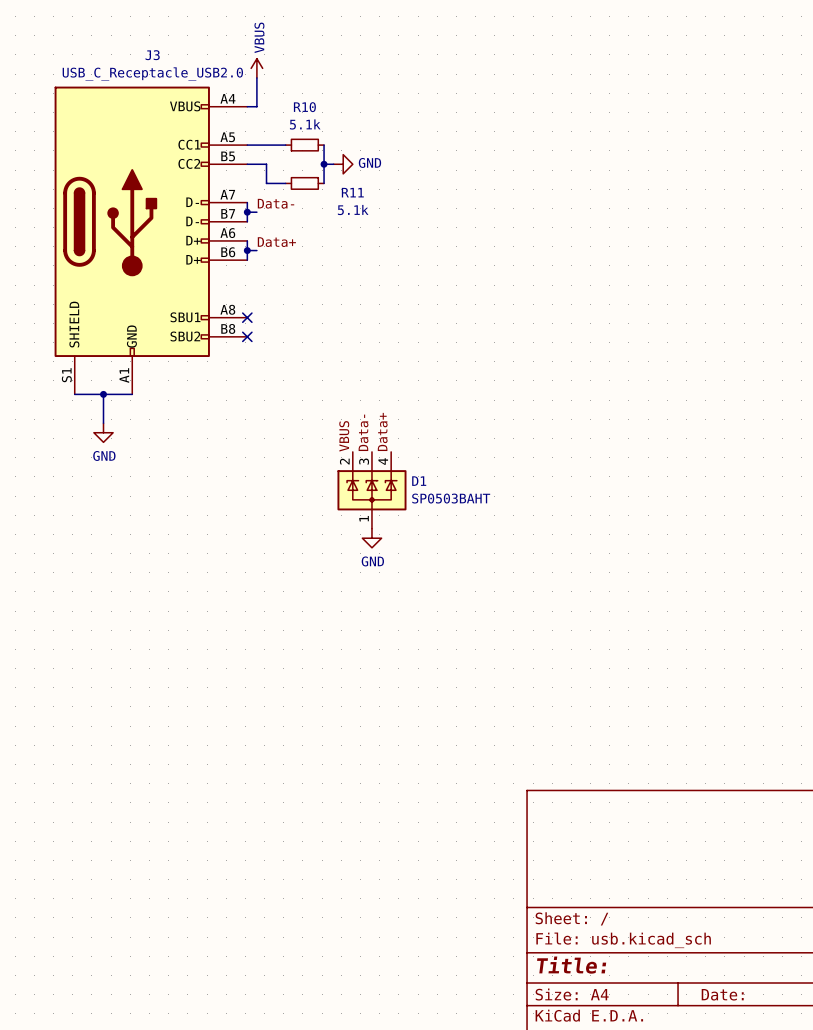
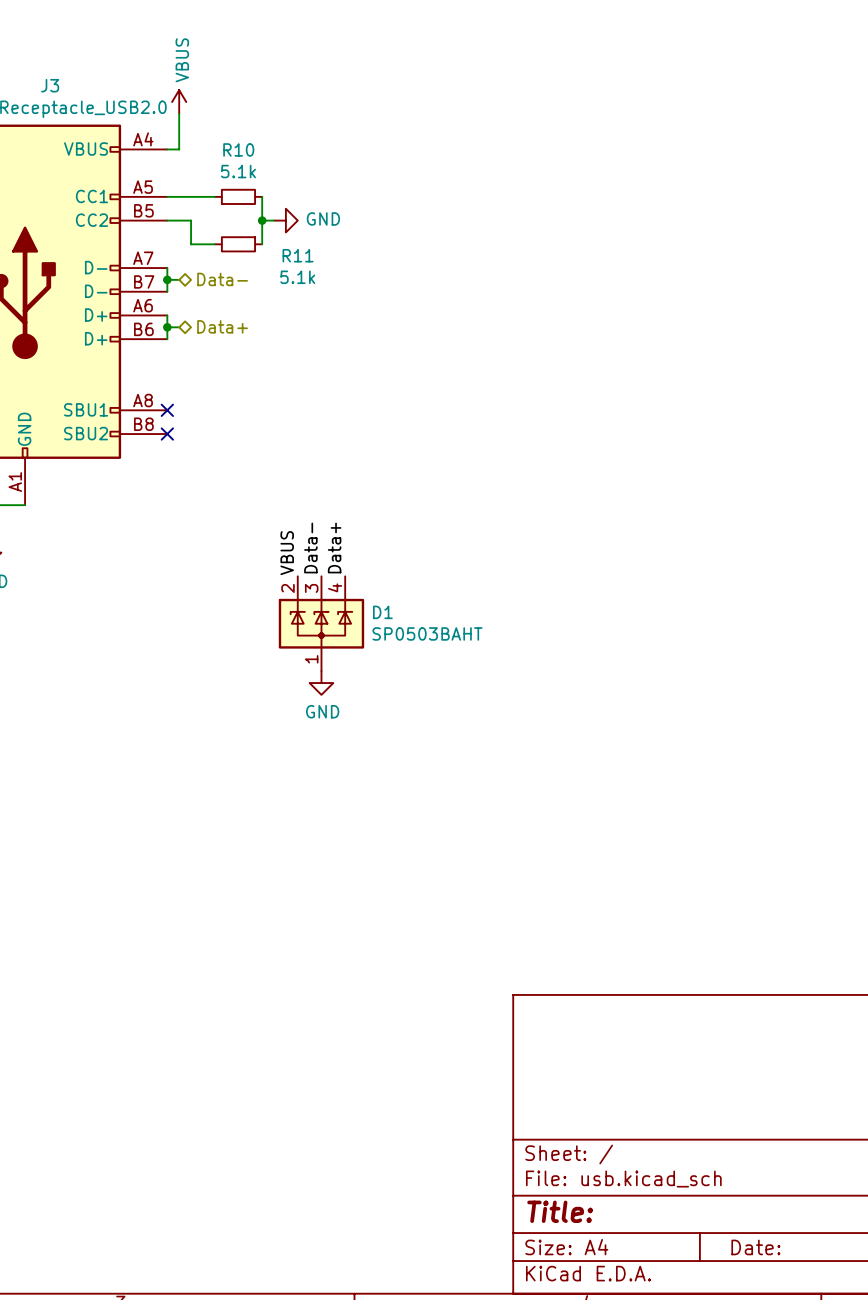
label: Data- (276, 203) -> none
hierarchical label: none -> Data- (222, 279)
label: Data+ (276, 242) -> none
hierarchical label: none -> Data+ (222, 326)

